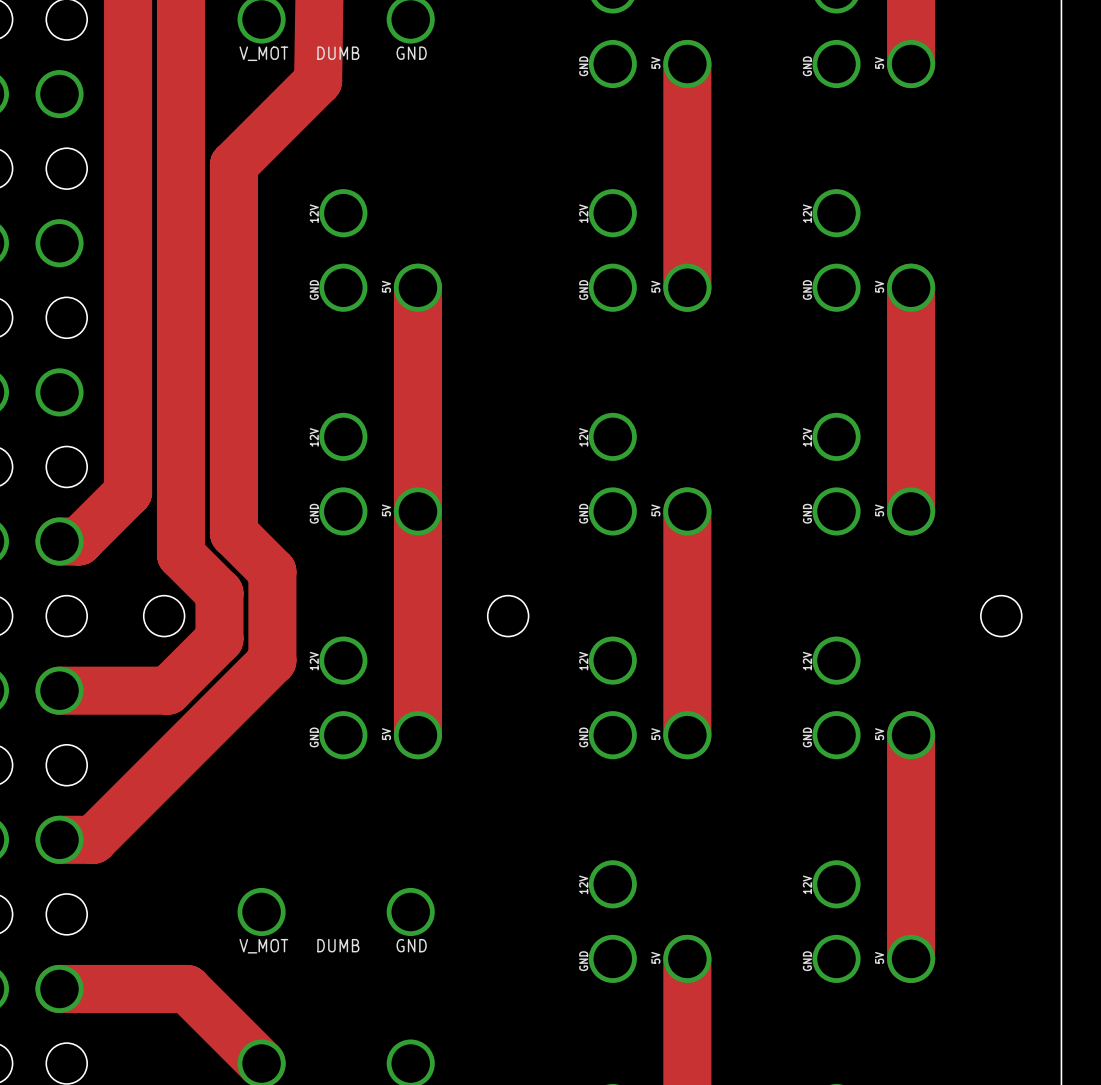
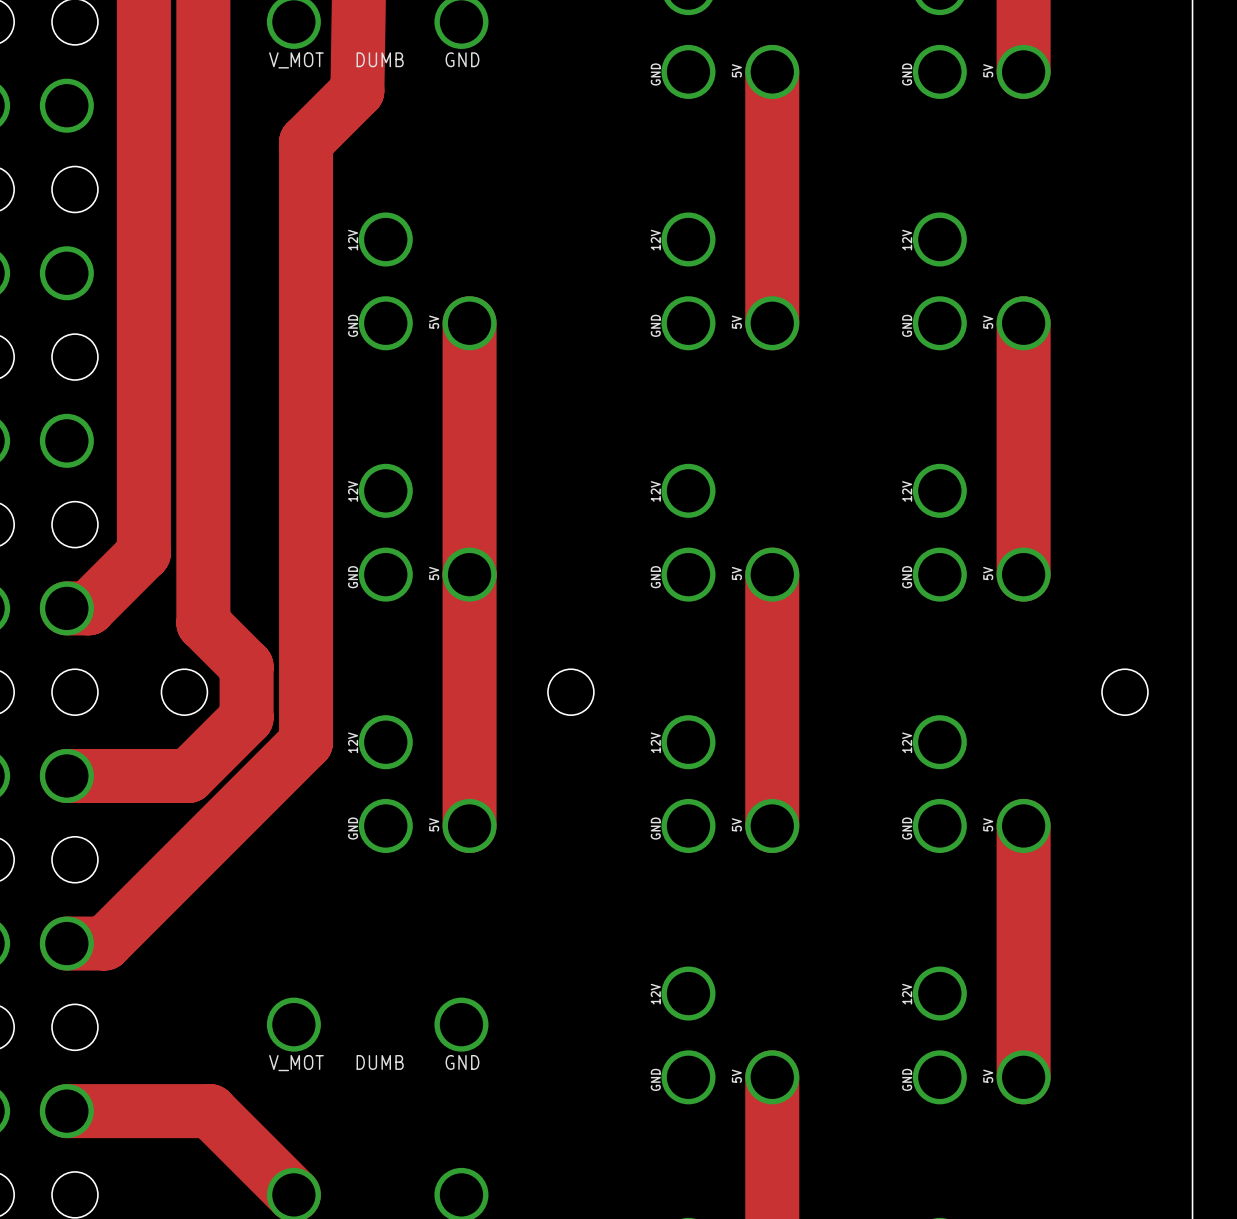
track: (272, 126) (233, 165) (233, 533) (272, 571) -> (306, 142) (306, 642)

